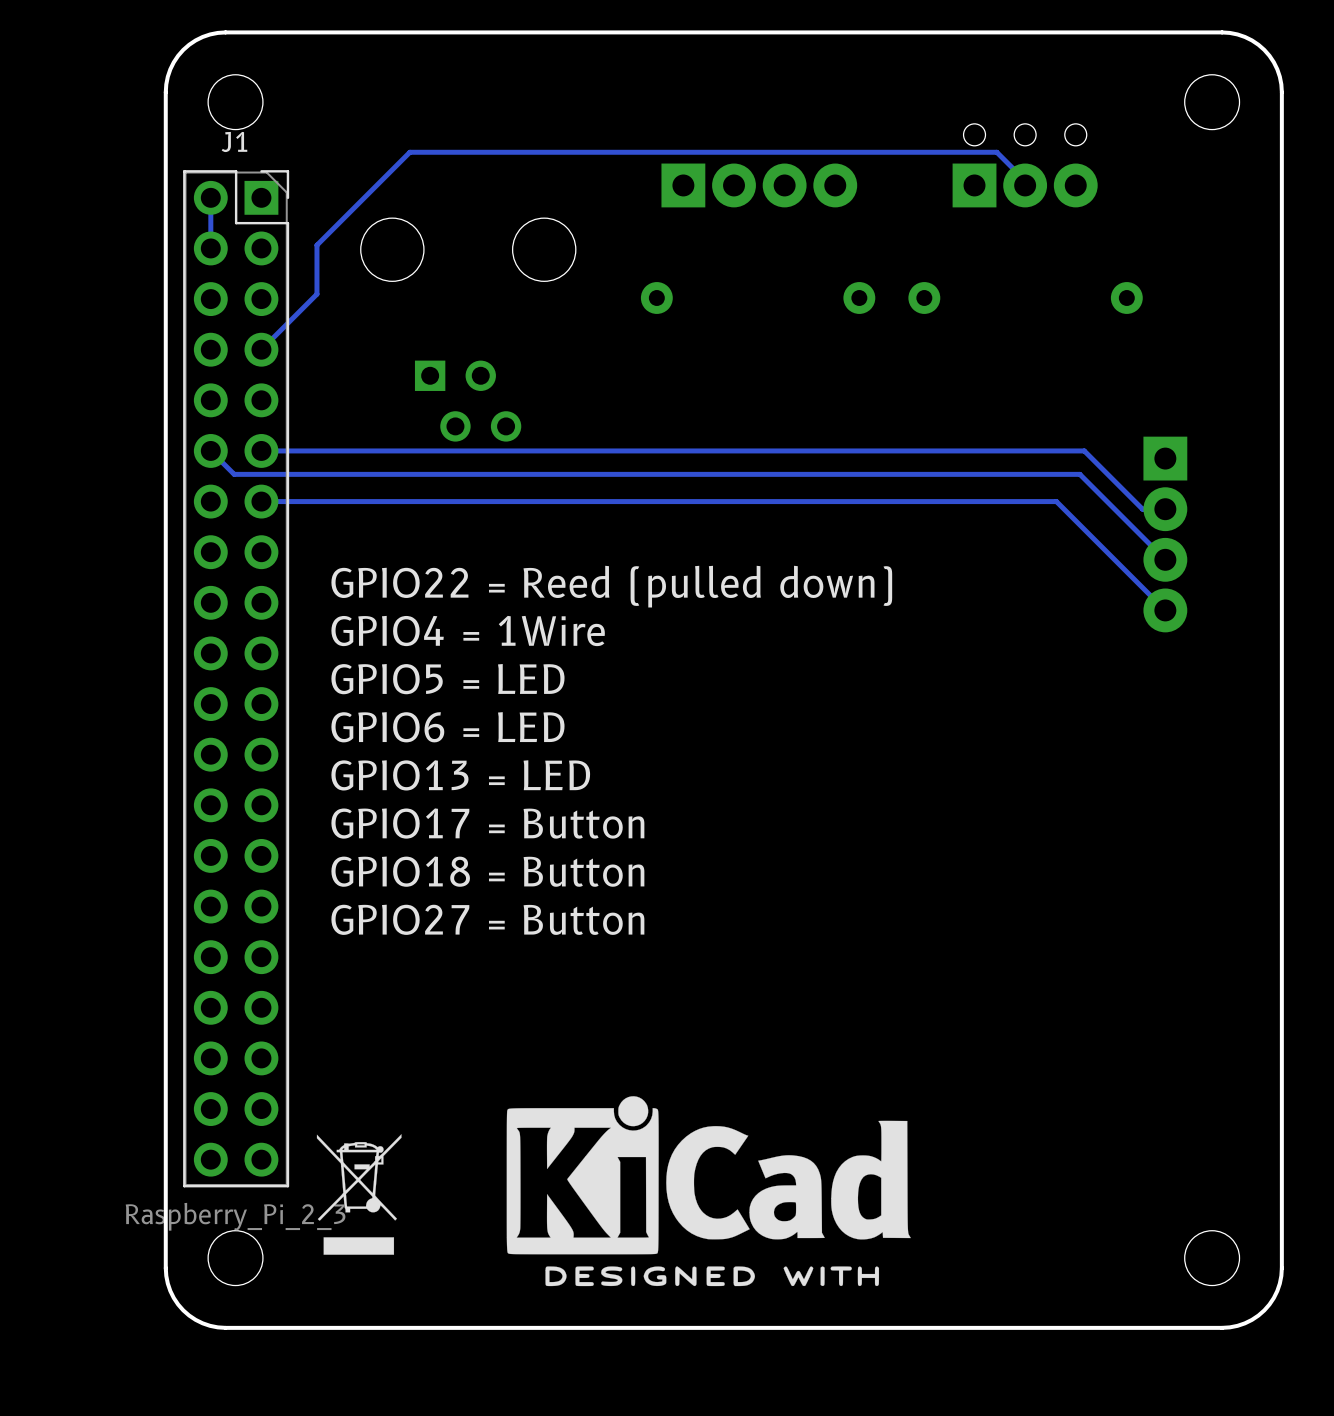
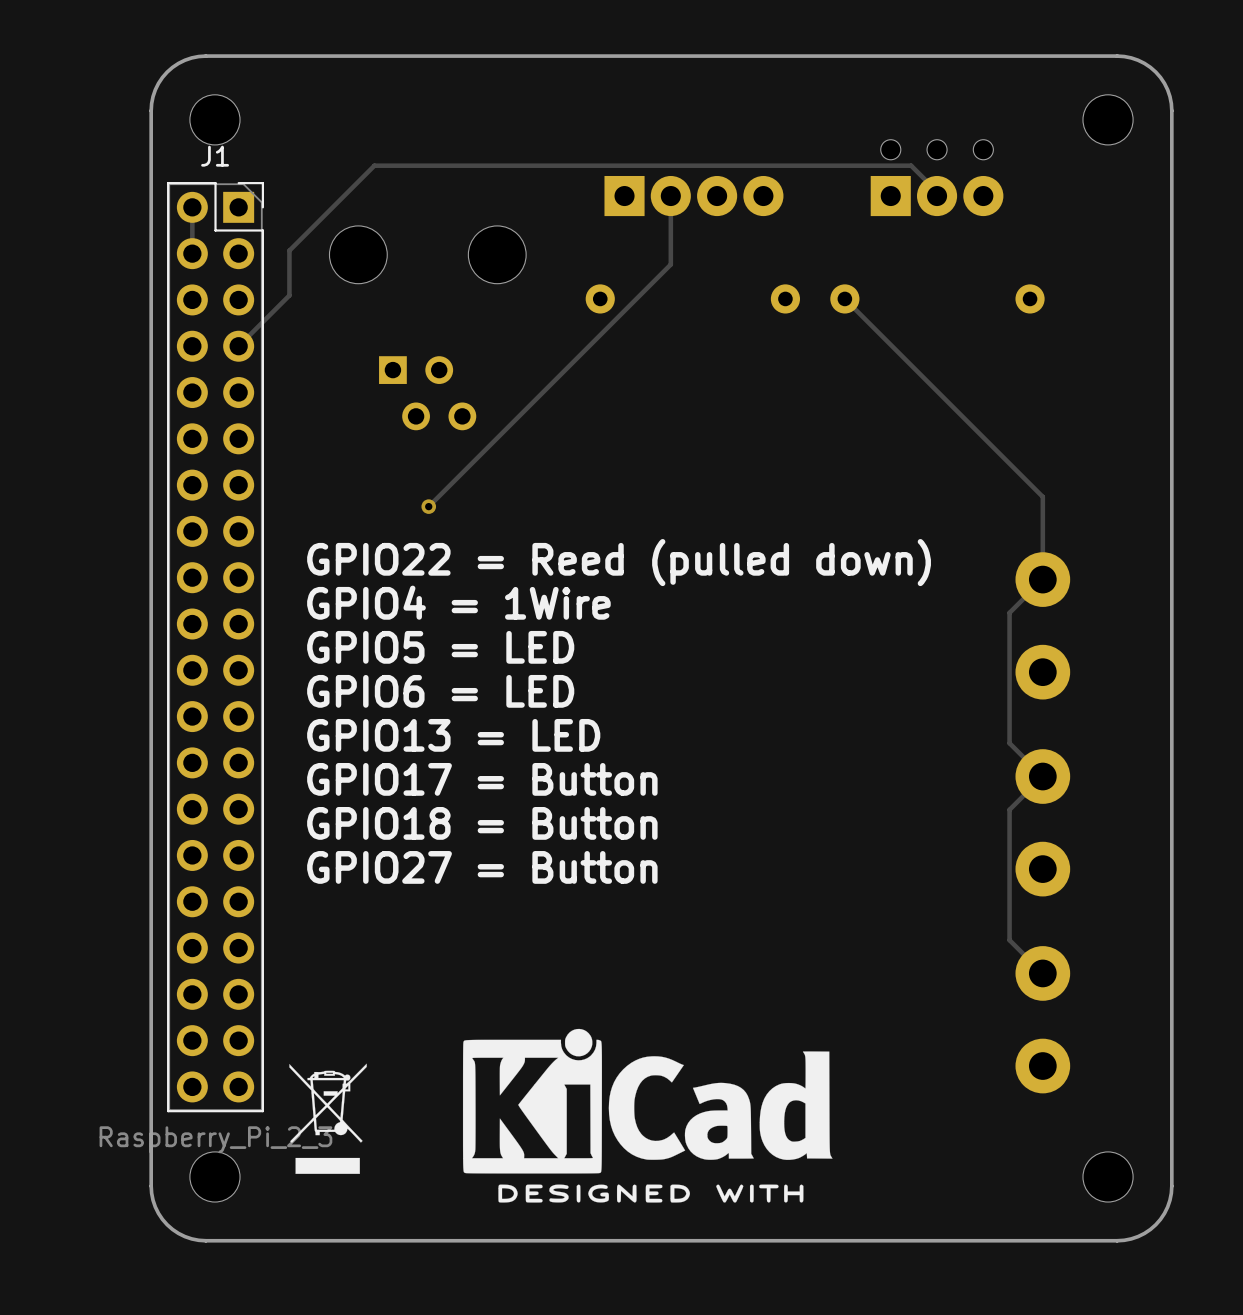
track: none -> (670, 196) (670, 264) (428, 506)
track: none -> (844, 298) (1042, 496) (1042, 579) (1009, 612) (1009, 743) (1042, 776) (1009, 809) (1009, 940) (1042, 973)
track: (210, 450) (234, 474) (1079, 474) (1165, 559) -> none
track: (261, 450) (1084, 450) (1142, 509) (1165, 509) -> none
track: (261, 501) (1056, 501) (1165, 610) -> none
via: none -> (428, 506)
part: (1165, 534) -> none
part: none -> (1042, 625)
part: none -> (1042, 822)
part: none -> (1042, 1019)

